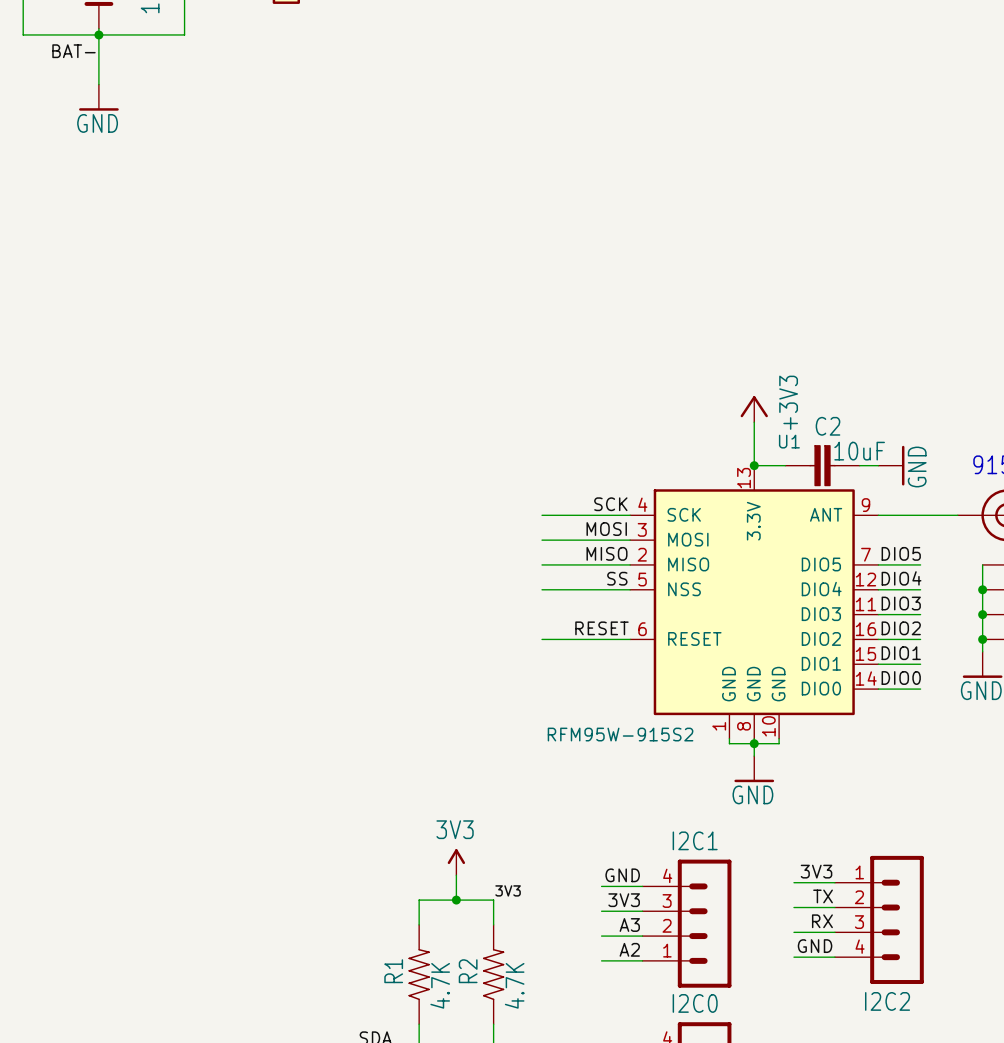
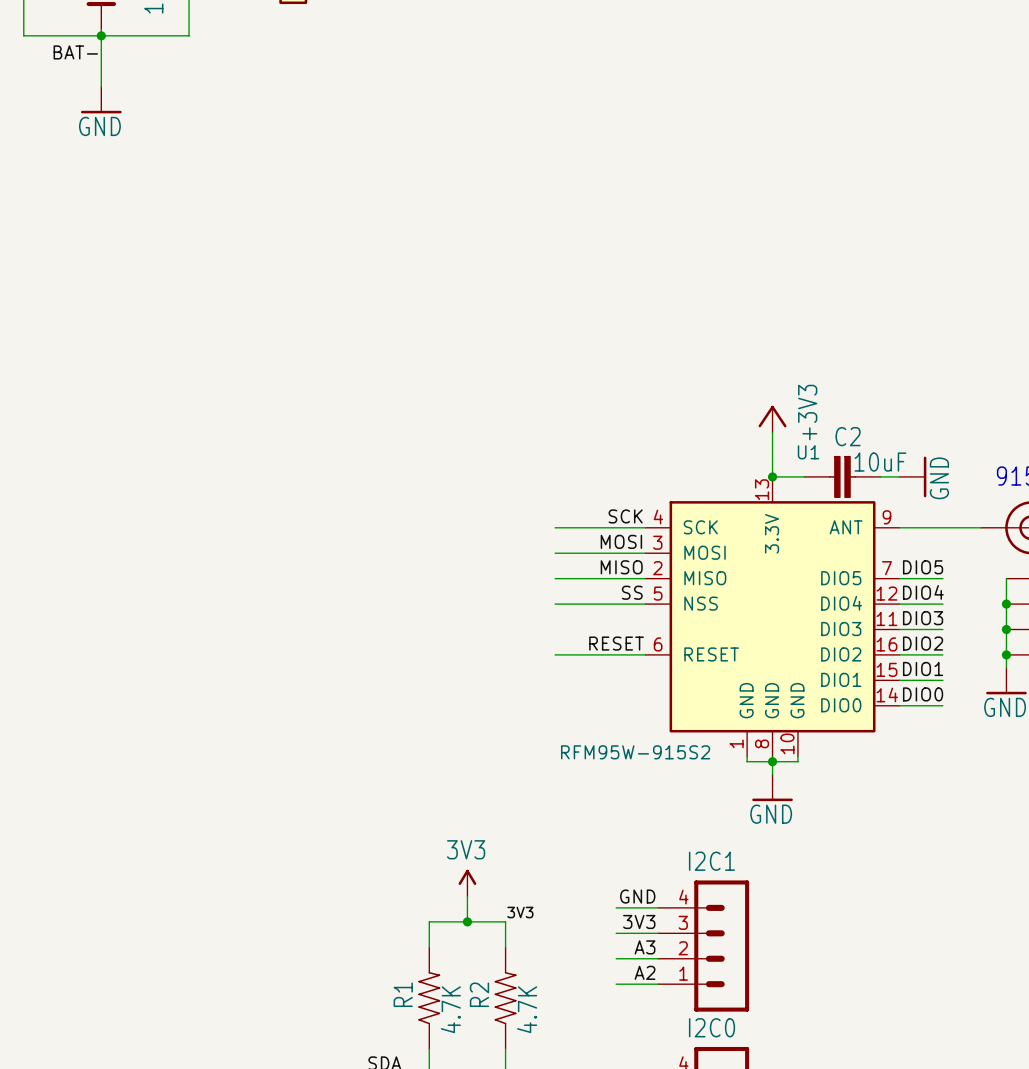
label: 3V3 (816, 871) -> none
wire: (793, 882) (834, 882) -> none
label: TX (823, 896) -> none
wire: (793, 907) (834, 907) -> none
I2C2: (879, 919) -> none
label: RX (822, 921) -> none
wire: (793, 932) (834, 932) -> none
label: GND (815, 946) -> none
wire: (793, 957) (834, 957) -> none

